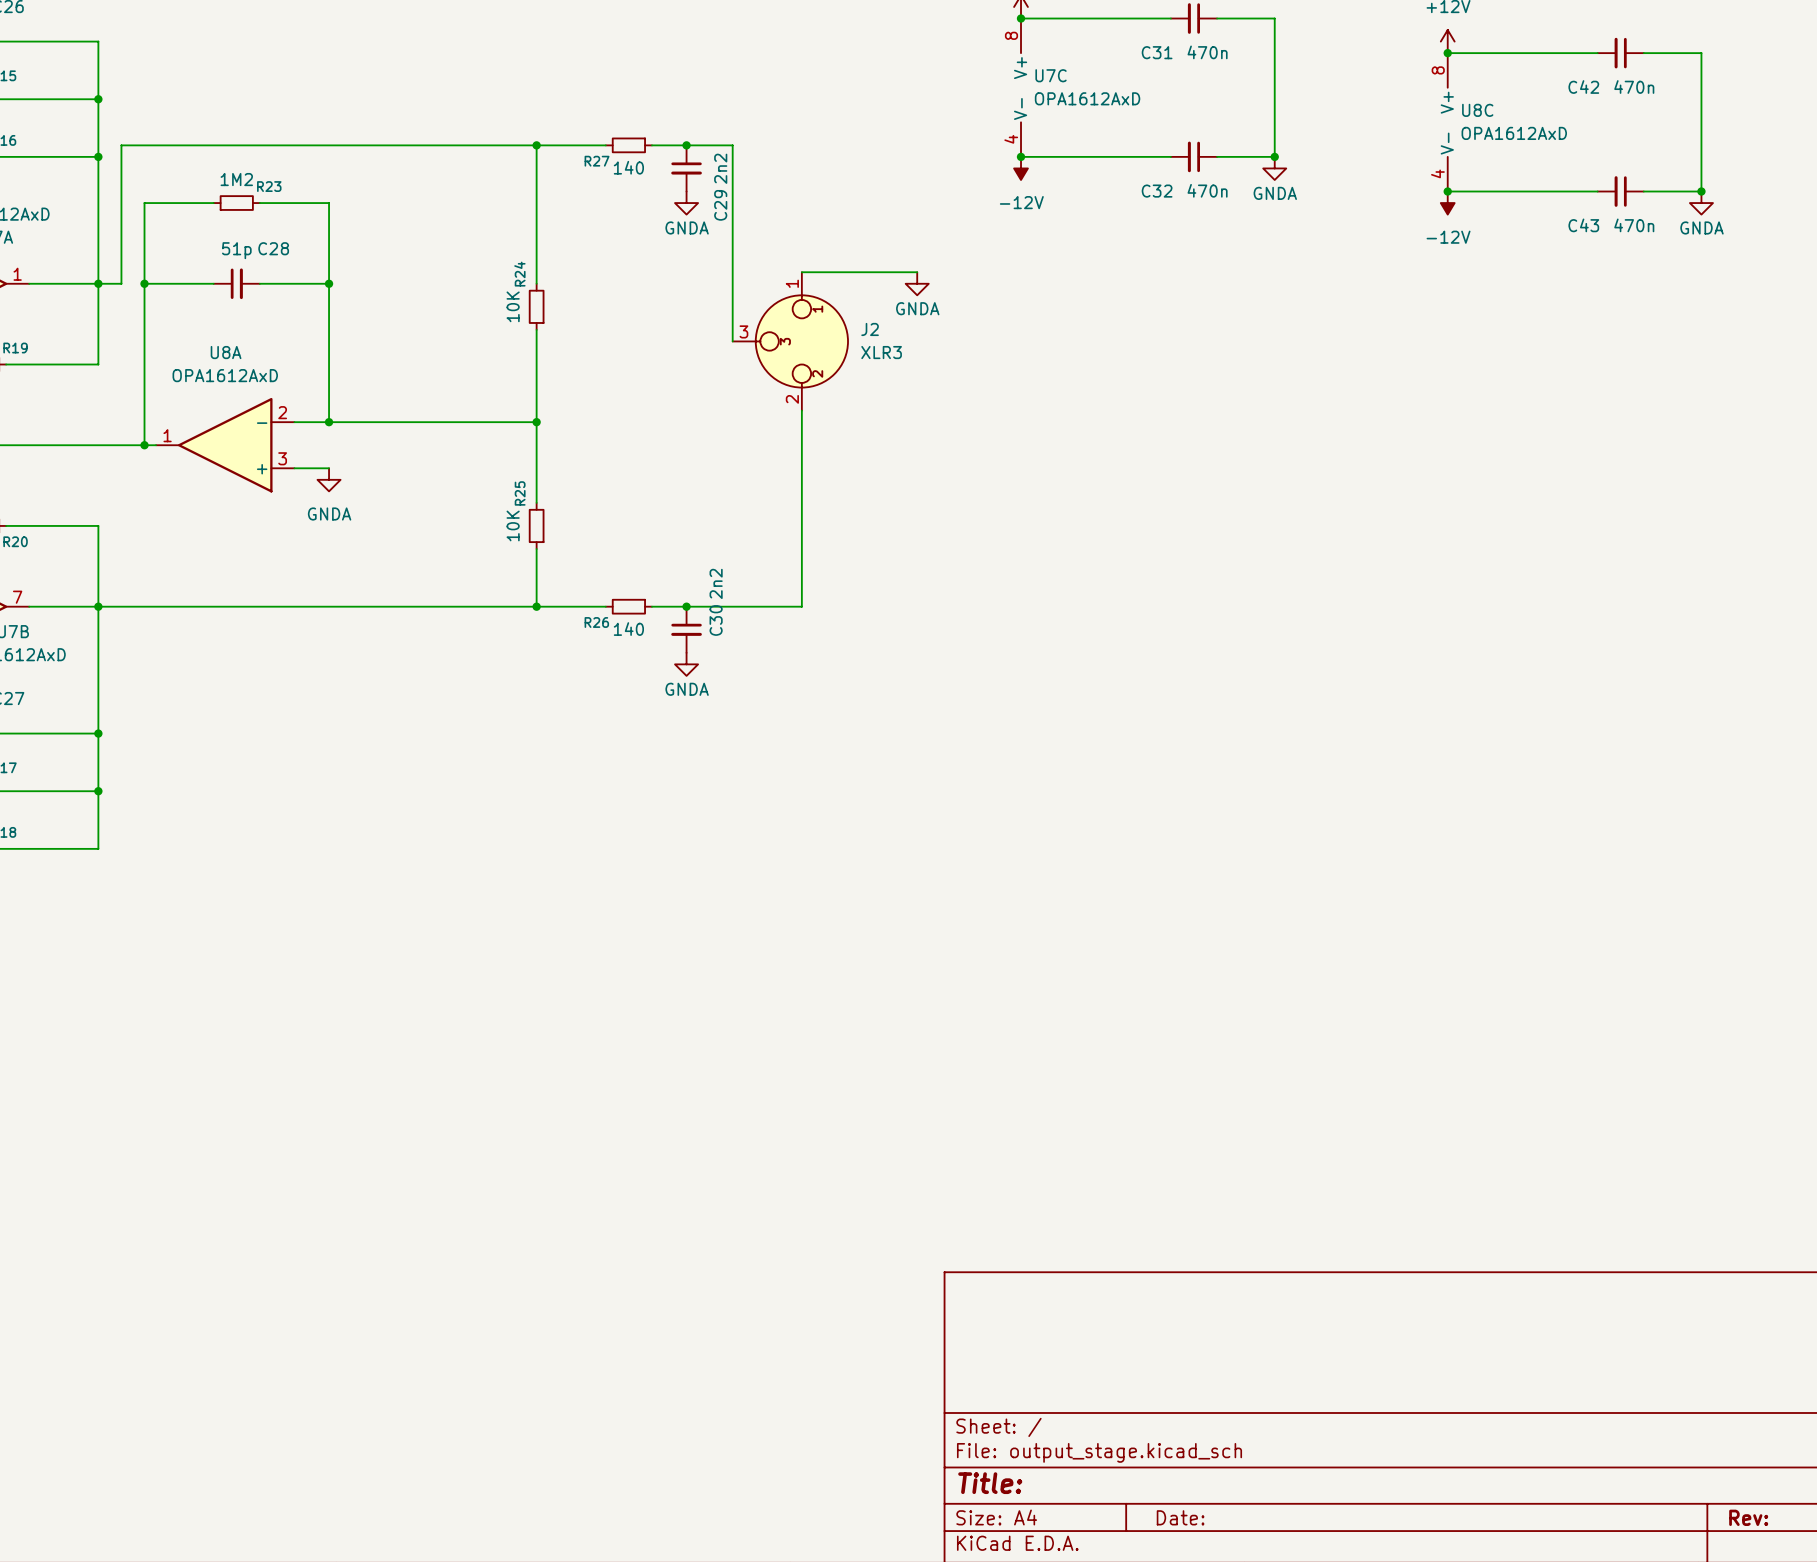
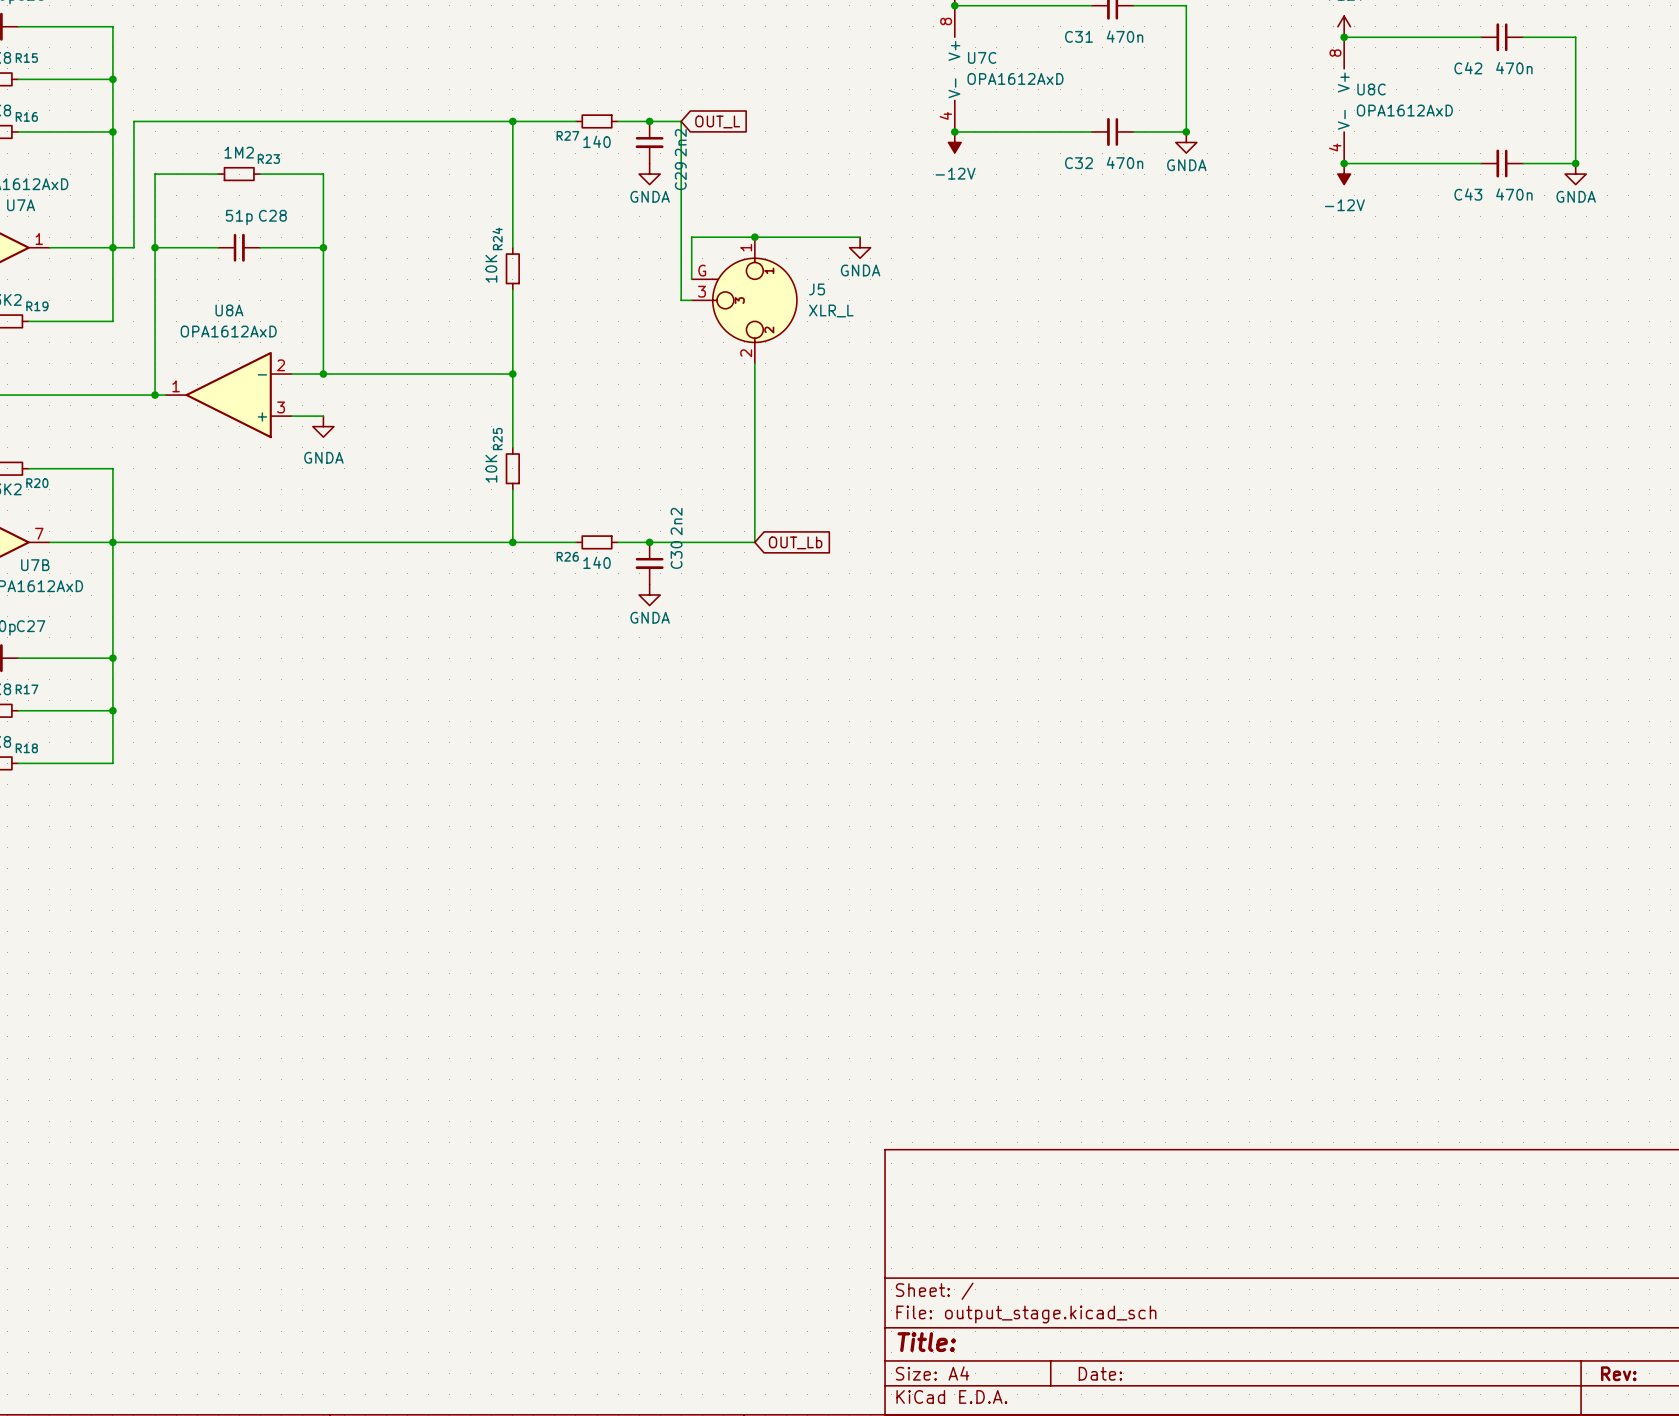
wire: (721, 145) (732, 145) (732, 272) -> (681, 121) (681, 300) (691, 300)
global label: none -> OUT_L (717, 121)
wire: none -> (691, 237) (754, 237)
junction: none -> (754, 237)
wire: (732, 318) (732, 341) -> none
J2: XLR3 (790, 341) -> none
J5: none -> XLR_L (744, 300)
global label: none -> OUT_Lb (795, 542)

